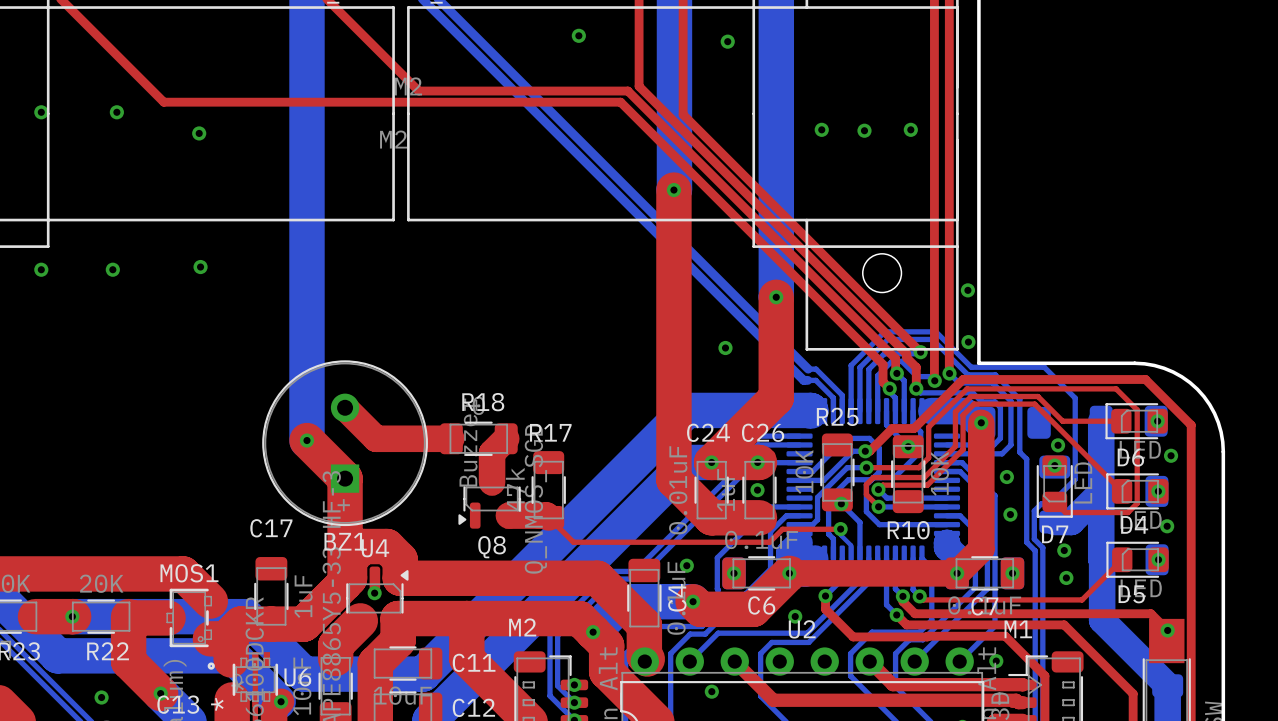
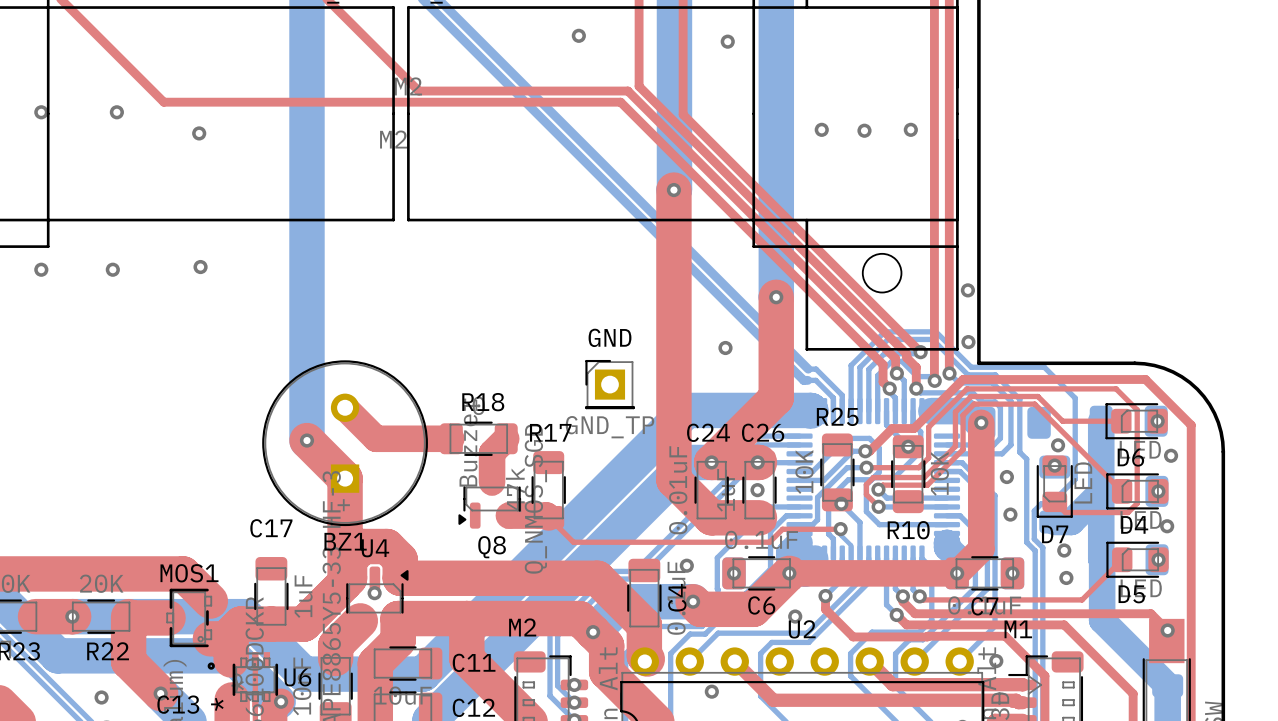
GND: none -> GND_TP (610, 384)

